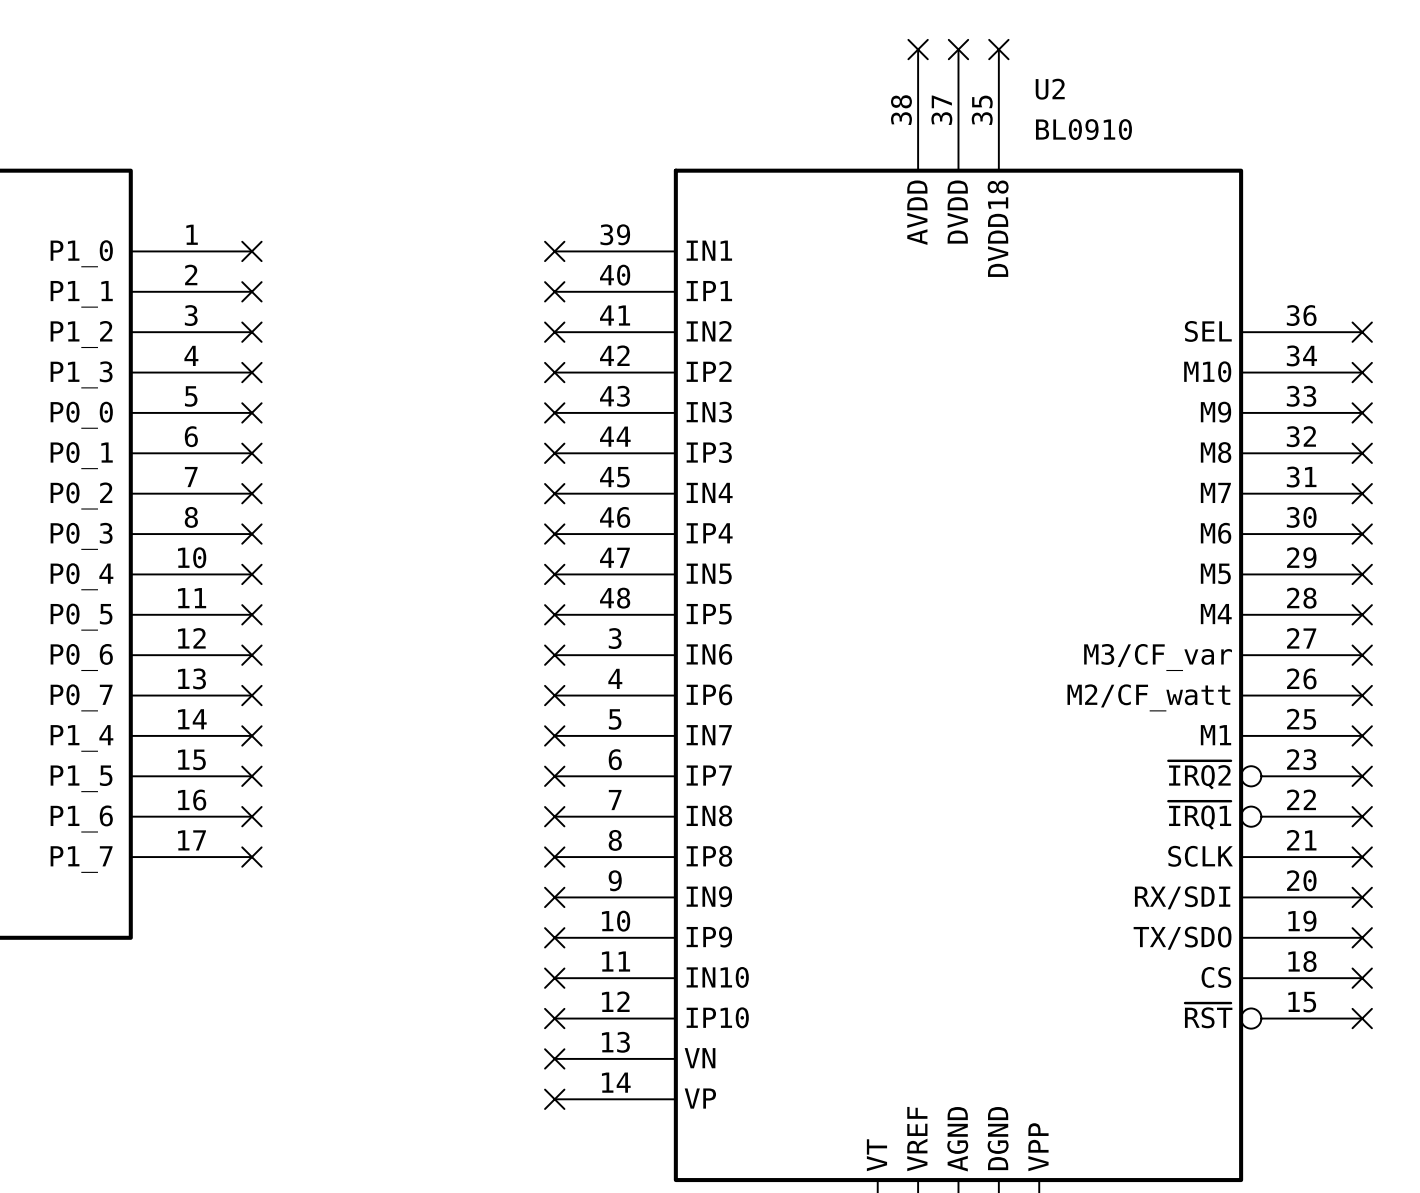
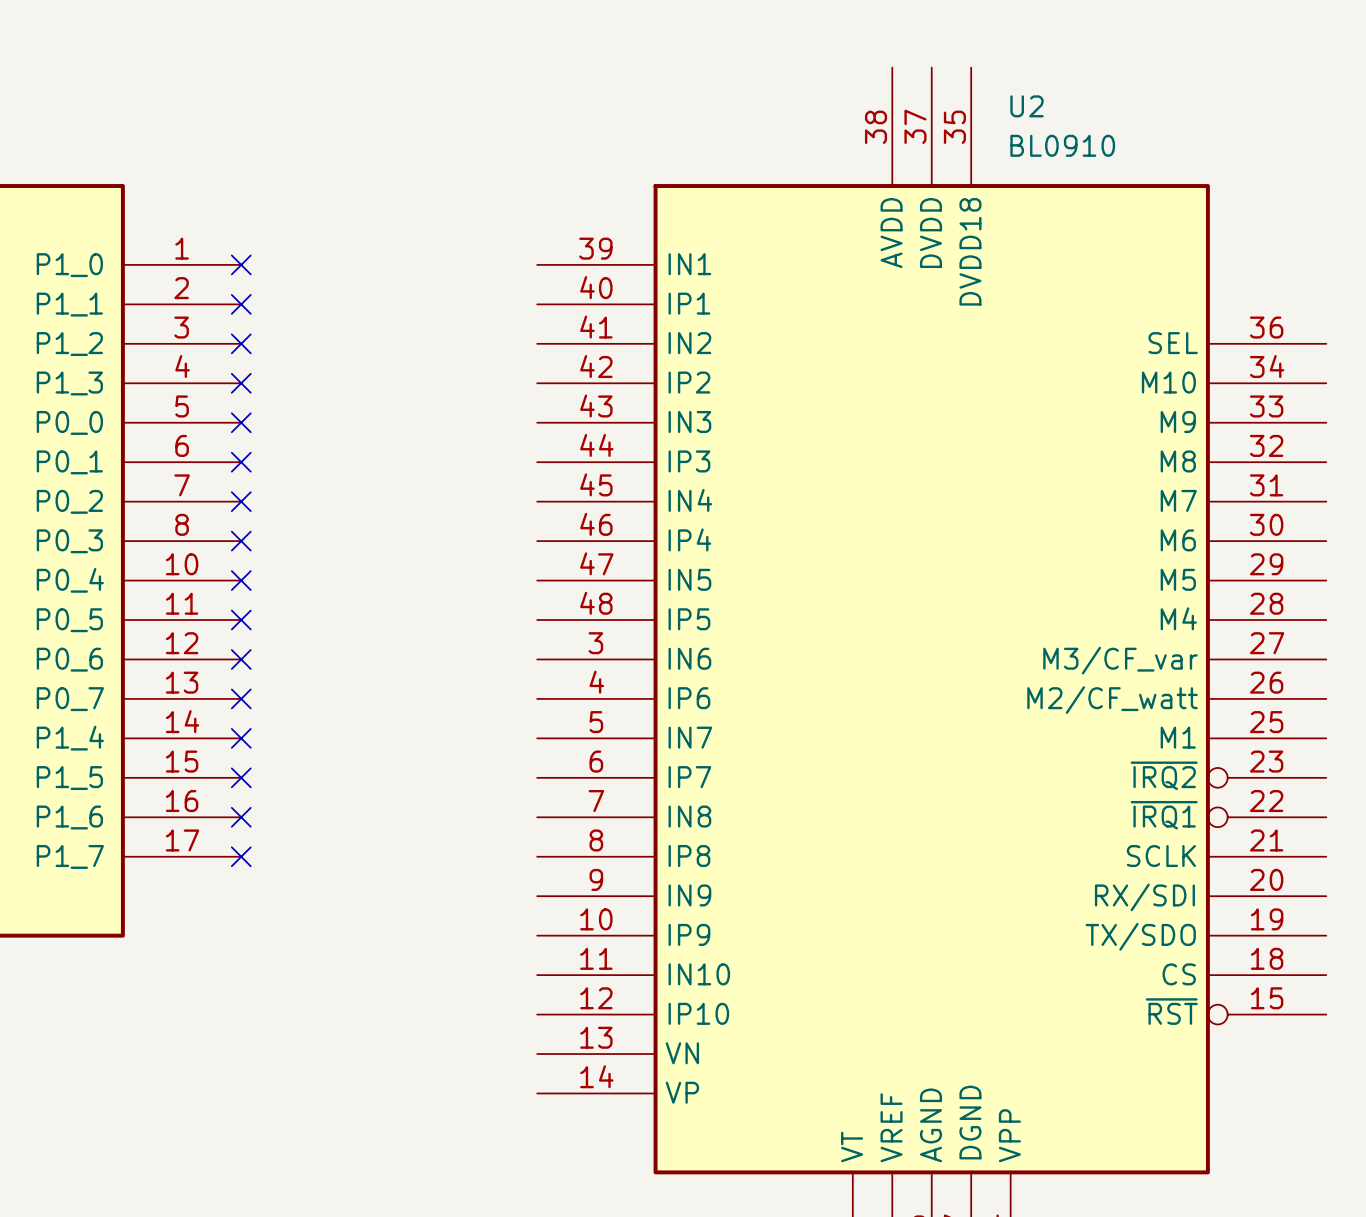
no-connect mark: (918, 49) -> none
no-connect mark: (958, 49) -> none
no-connect mark: (998, 49) -> none
no-connect mark: (554, 251) -> none
no-connect mark: (554, 291) -> none
no-connect mark: (554, 332) -> none
no-connect mark: (1362, 332) -> none
no-connect mark: (554, 372) -> none
no-connect mark: (1362, 372) -> none
no-connect mark: (554, 412) -> none
no-connect mark: (1362, 412) -> none
no-connect mark: (554, 453) -> none
no-connect mark: (1362, 453) -> none
no-connect mark: (554, 493) -> none
no-connect mark: (1362, 493) -> none
no-connect mark: (554, 534) -> none
no-connect mark: (1362, 534) -> none
no-connect mark: (554, 574) -> none
no-connect mark: (1362, 574) -> none
no-connect mark: (554, 614) -> none
no-connect mark: (1362, 614) -> none
no-connect mark: (554, 655) -> none
no-connect mark: (1362, 655) -> none
no-connect mark: (554, 695) -> none
no-connect mark: (1362, 695) -> none
no-connect mark: (554, 735) -> none
no-connect mark: (1362, 735) -> none
no-connect mark: (554, 776) -> none
no-connect mark: (1362, 776) -> none
no-connect mark: (554, 816) -> none
no-connect mark: (1362, 816) -> none
no-connect mark: (554, 857) -> none
no-connect mark: (1362, 857) -> none
no-connect mark: (554, 897) -> none
no-connect mark: (1362, 897) -> none
no-connect mark: (554, 937) -> none
no-connect mark: (1362, 937) -> none
no-connect mark: (554, 978) -> none
no-connect mark: (1362, 978) -> none
no-connect mark: (554, 1018) -> none
no-connect mark: (1362, 1018) -> none
no-connect mark: (554, 1058) -> none
no-connect mark: (554, 1099) -> none

